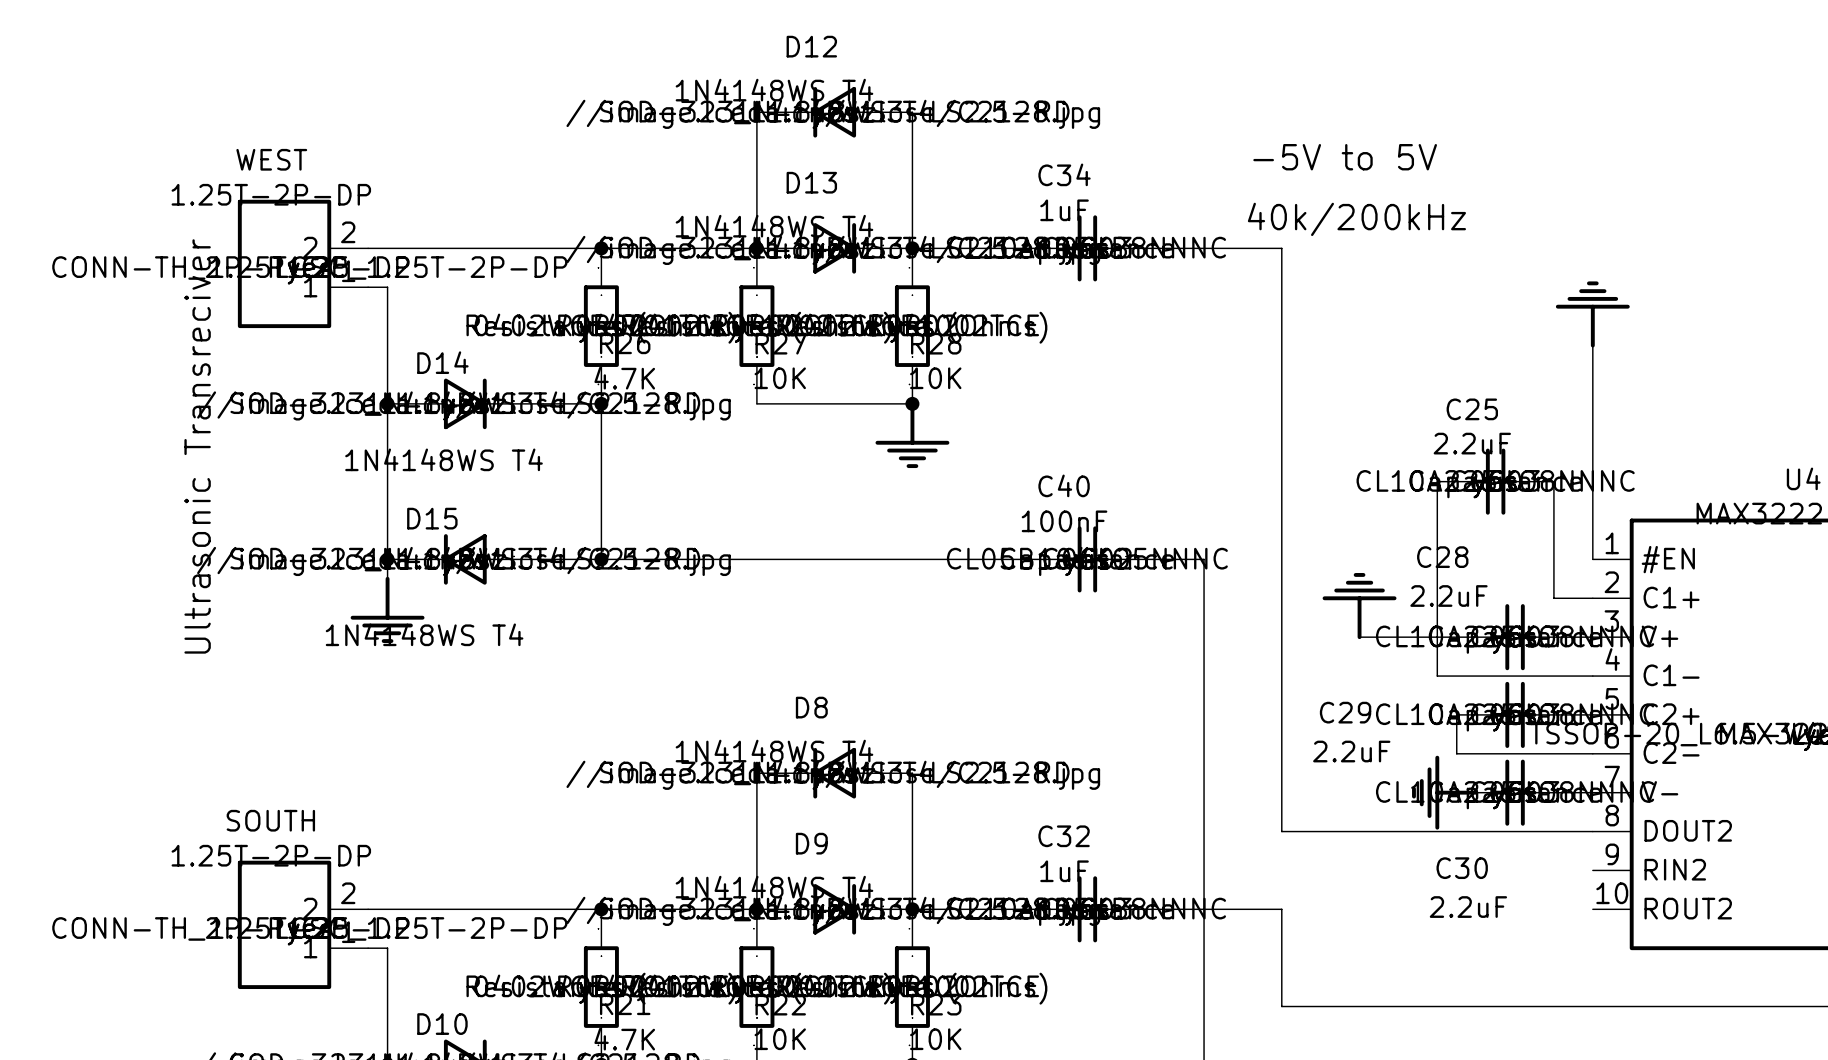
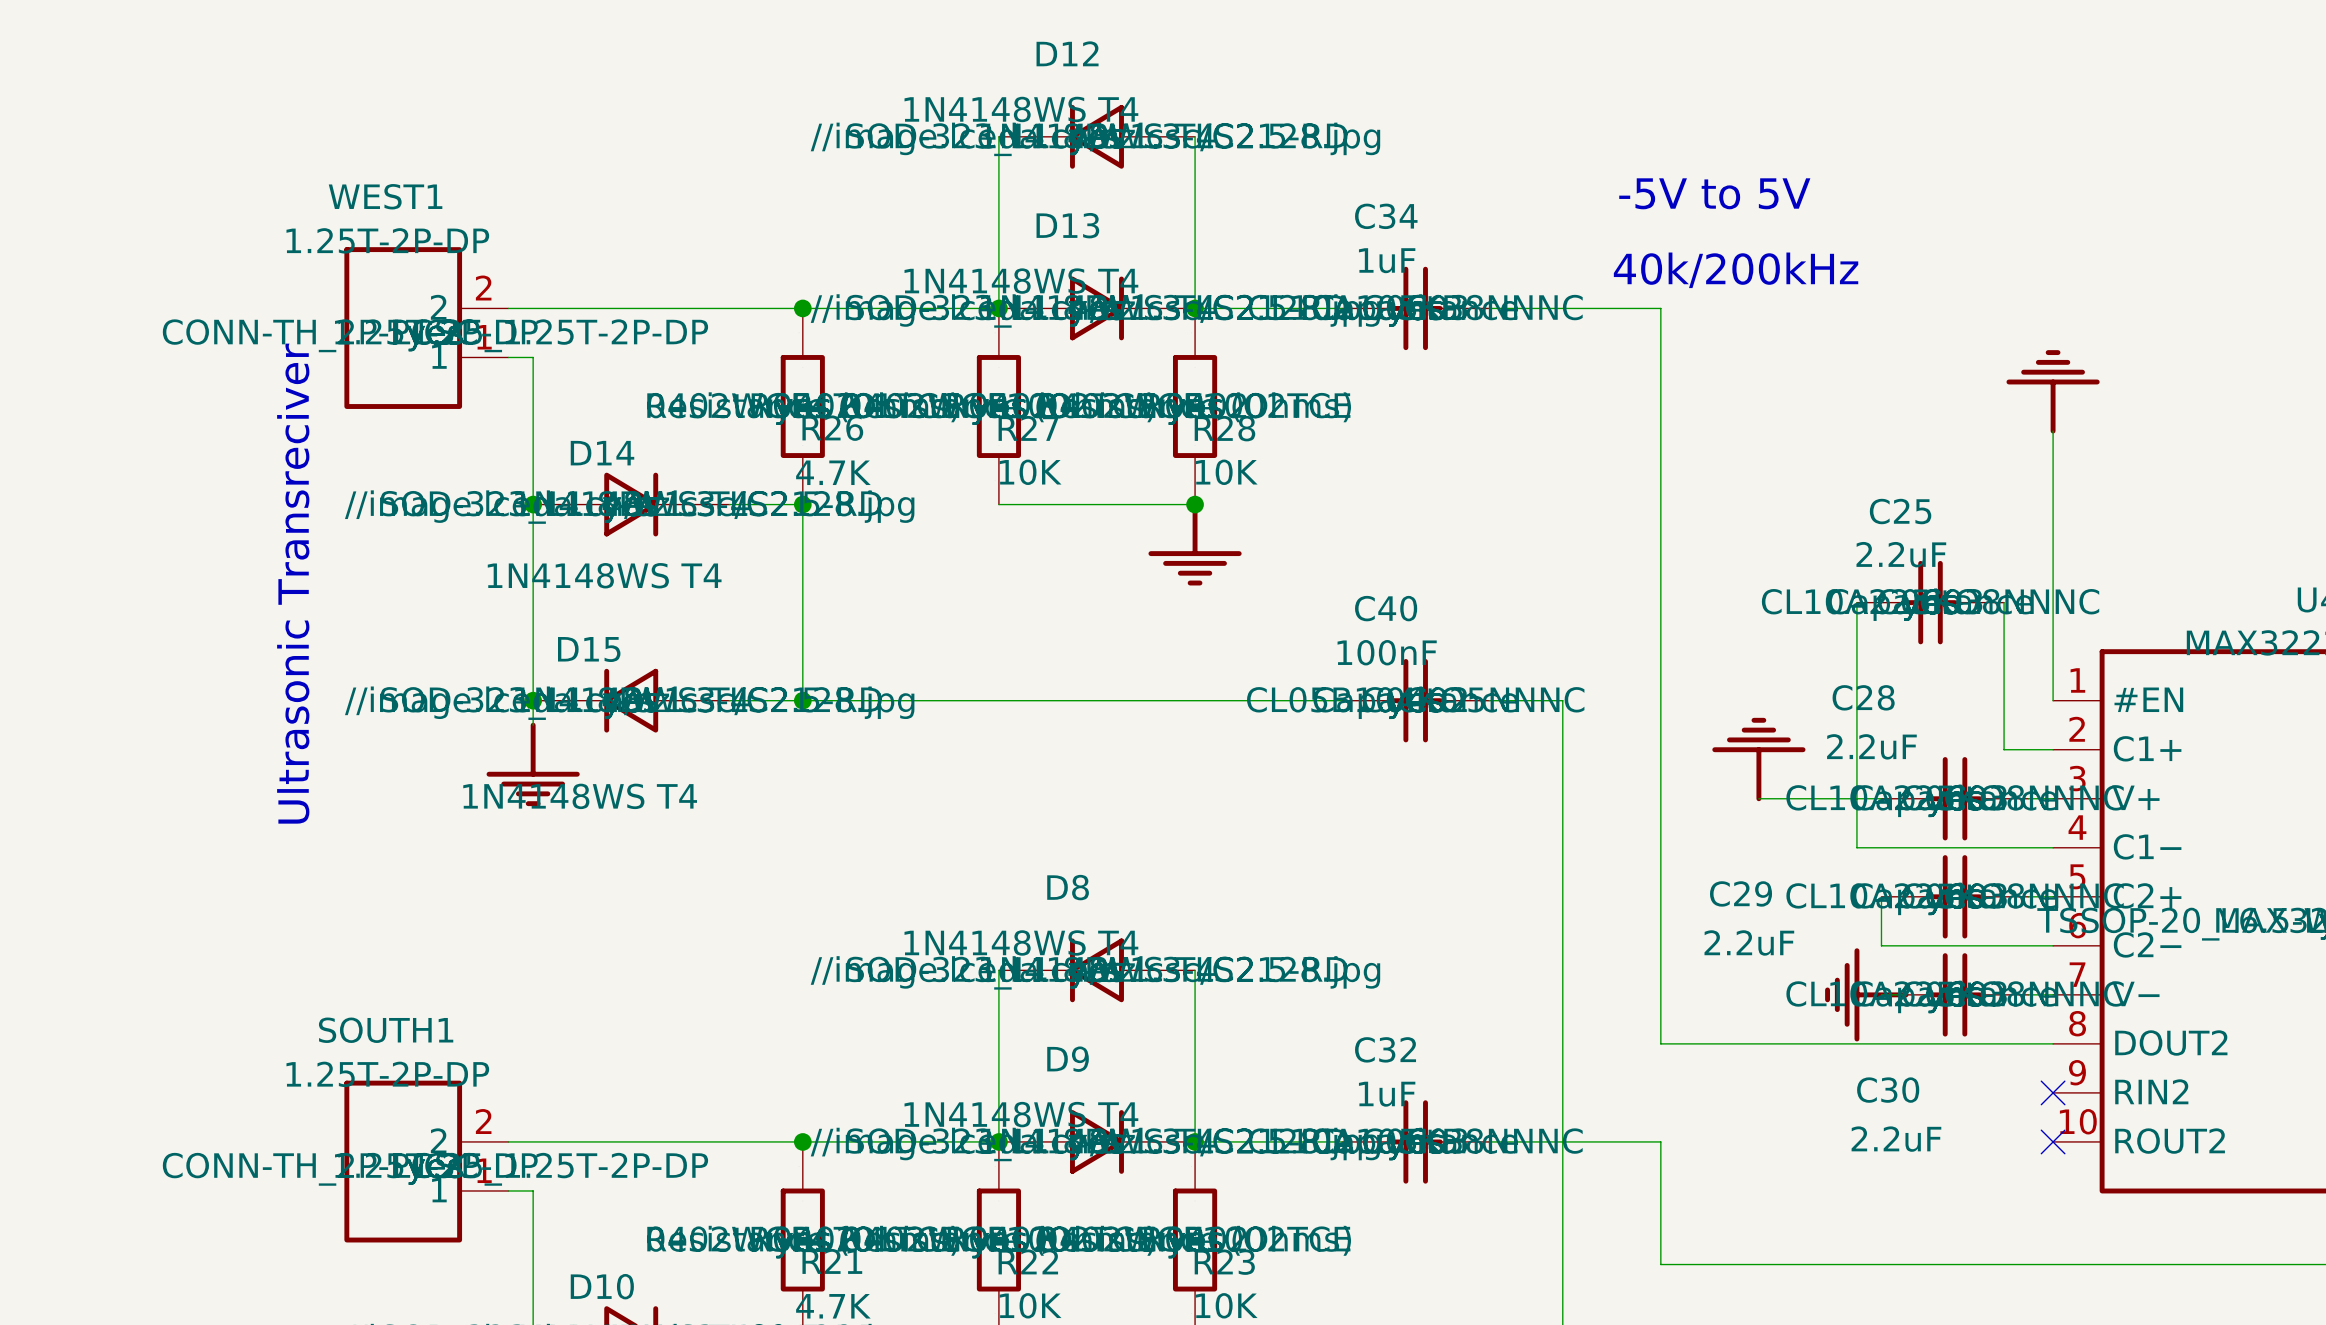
WEST name: WEST (271, 159) -> WEST1 (385, 196)
SOUTH name: SOUTH (270, 820) -> SOUTH1 (386, 1030)
no-connect mark: none -> (2053, 1092)
no-connect mark: none -> (2053, 1141)

